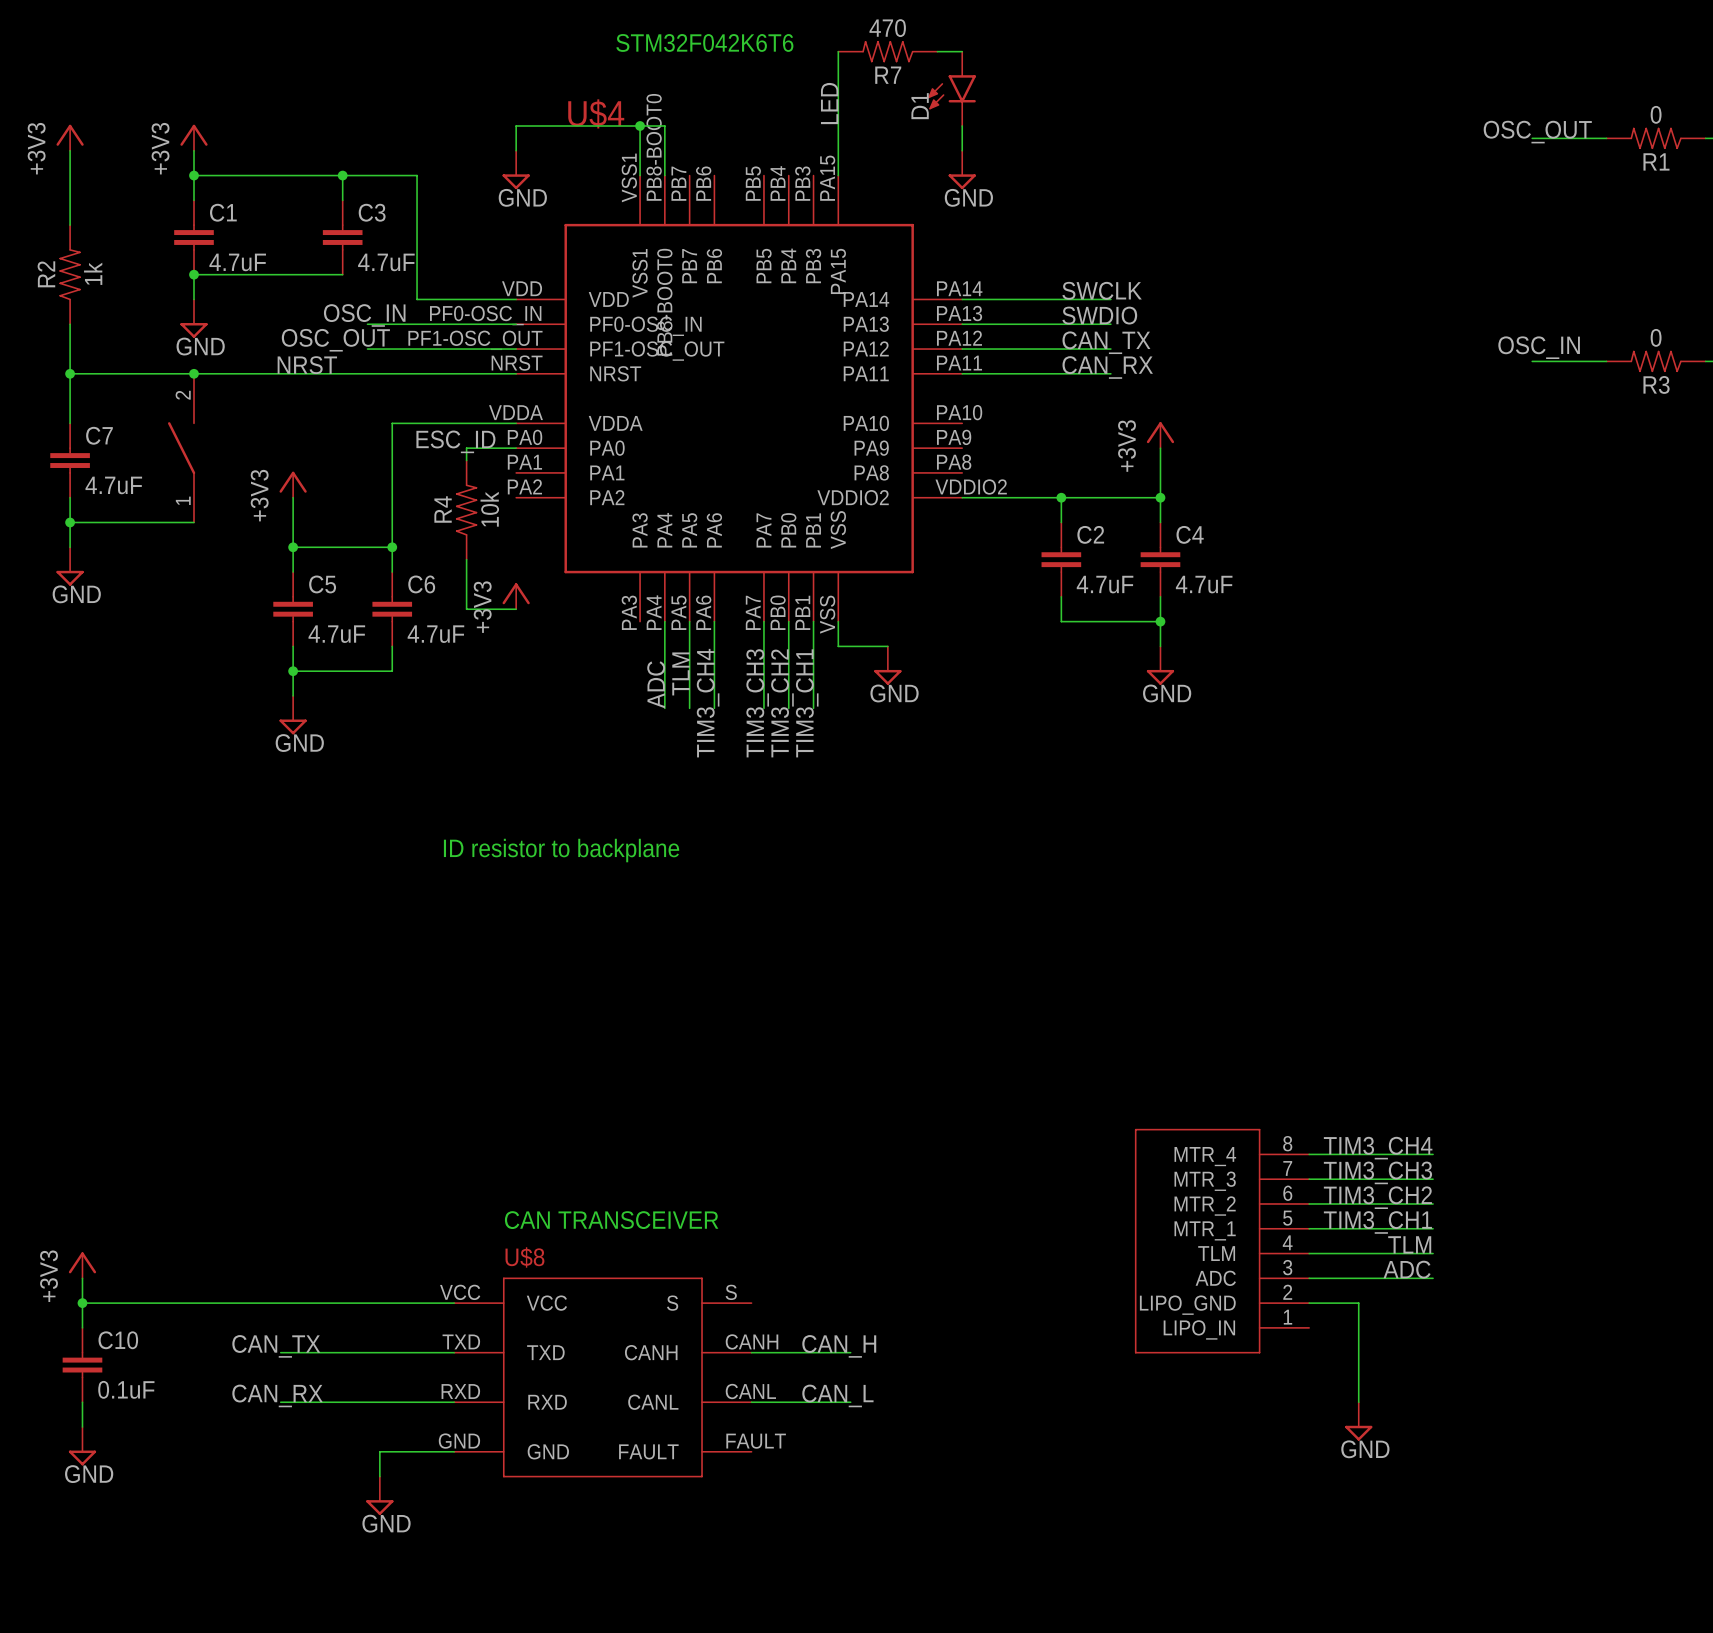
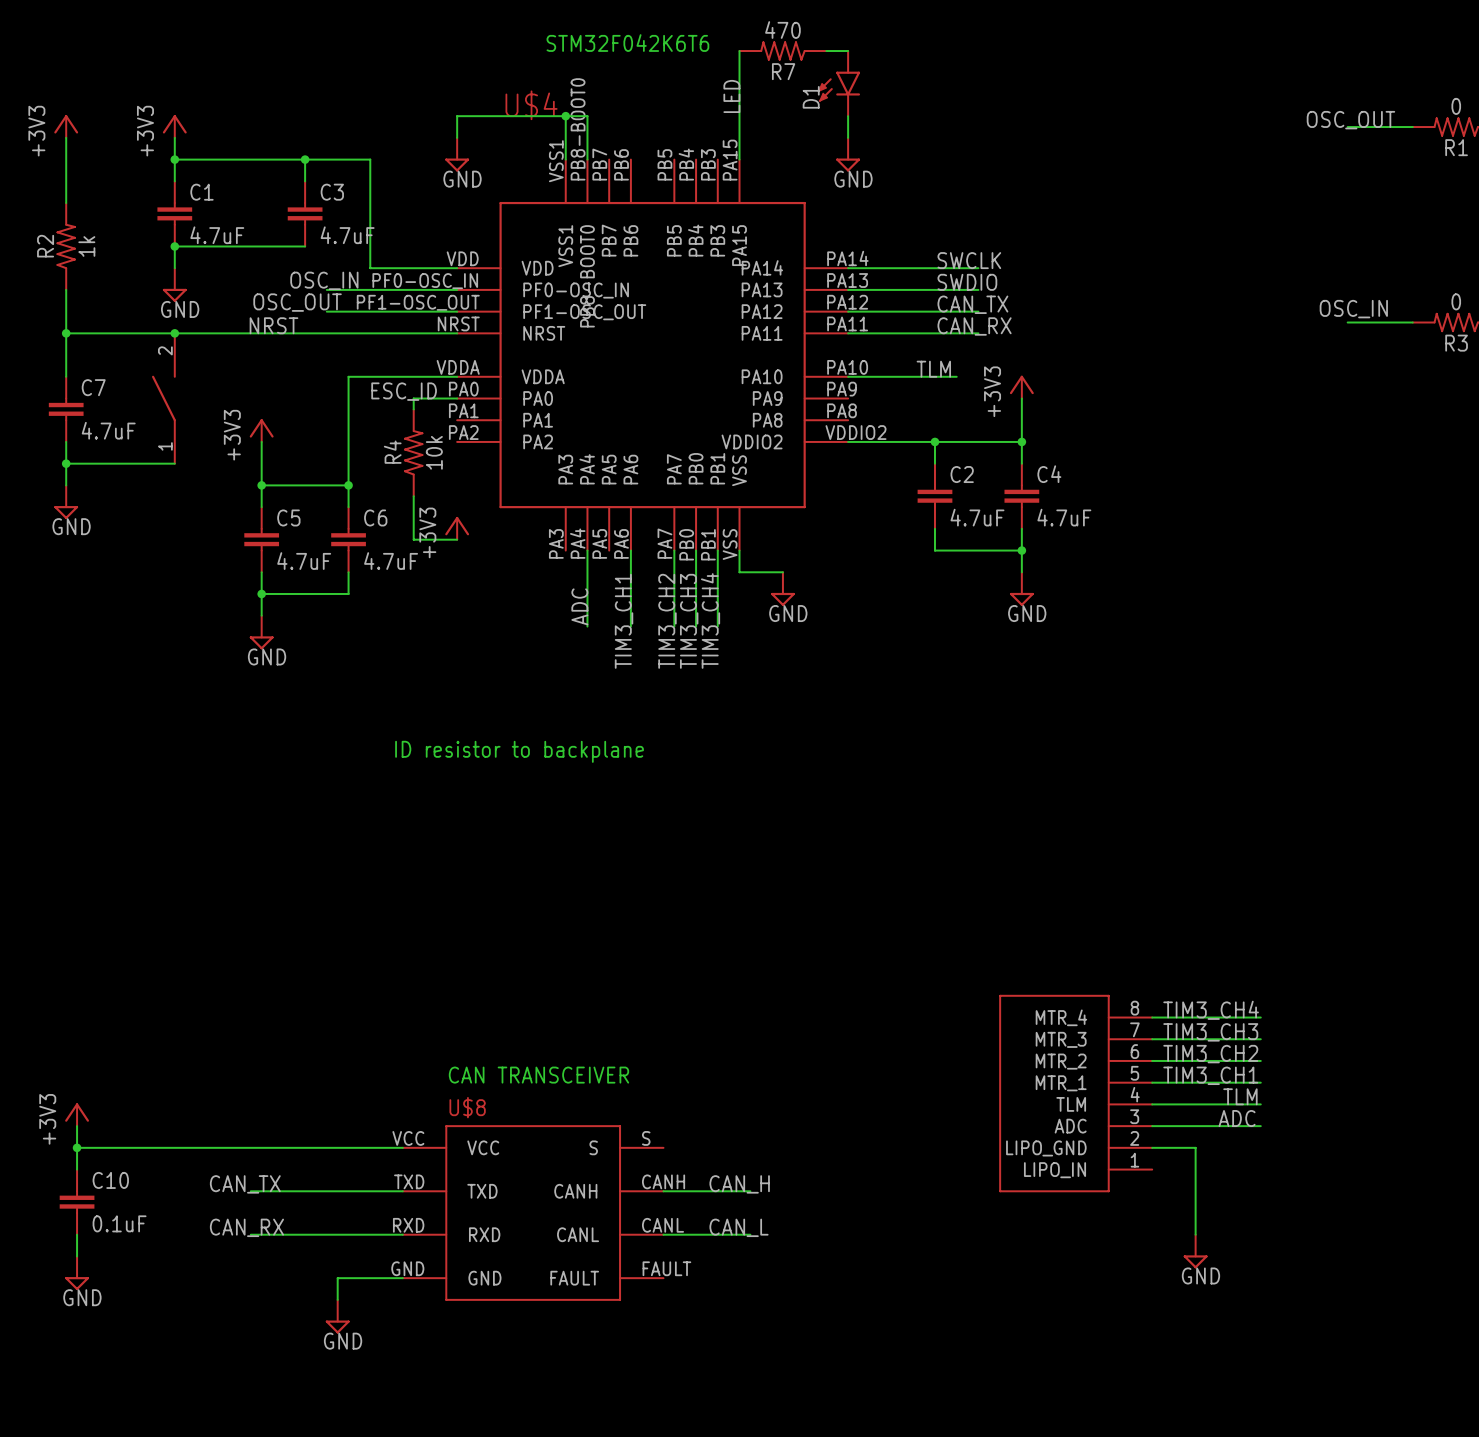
label: none -> TLM (933, 369)
wire: none -> (848, 376) (956, 376)
wire: (689, 621) (689, 708) -> none
label: TLM (680, 673) -> none
label: TIM3_CH4 (708, 703) -> TIM3_CH1 (624, 621)
label: TIM3_CH3 (757, 703) -> TIM3_CH2 (667, 621)
label: TIM3_CH2 (782, 703) -> TIM3_CH3 (689, 621)
label: TIM3_CH1 (807, 703) -> TIM3_CH4 (710, 620)

